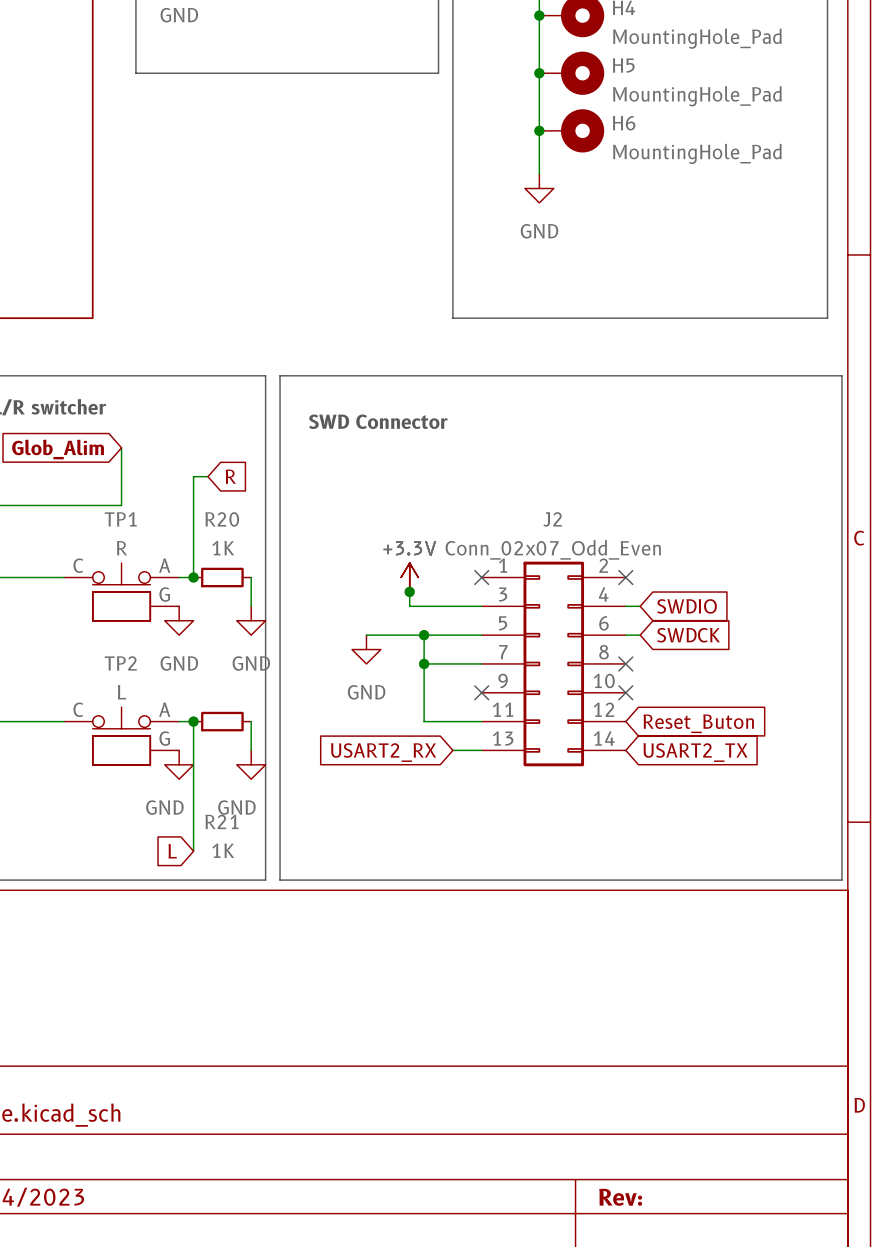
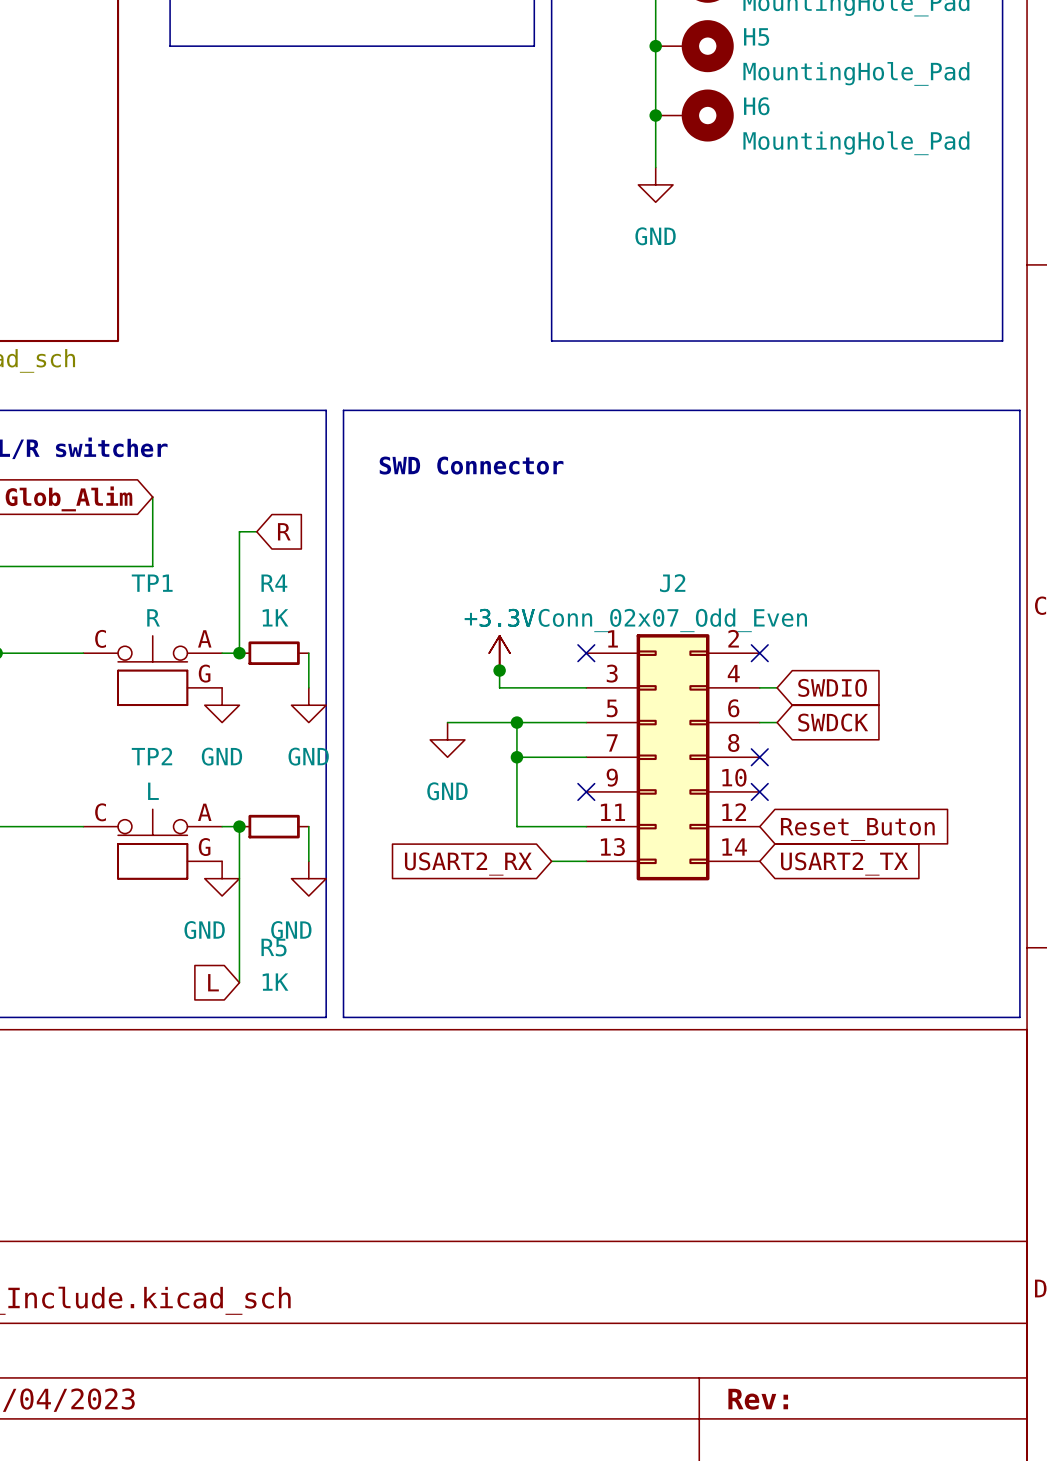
R20 name: R20 (222, 519) -> R4 (274, 583)
R21 name: R21 (221, 821) -> R5 (274, 947)

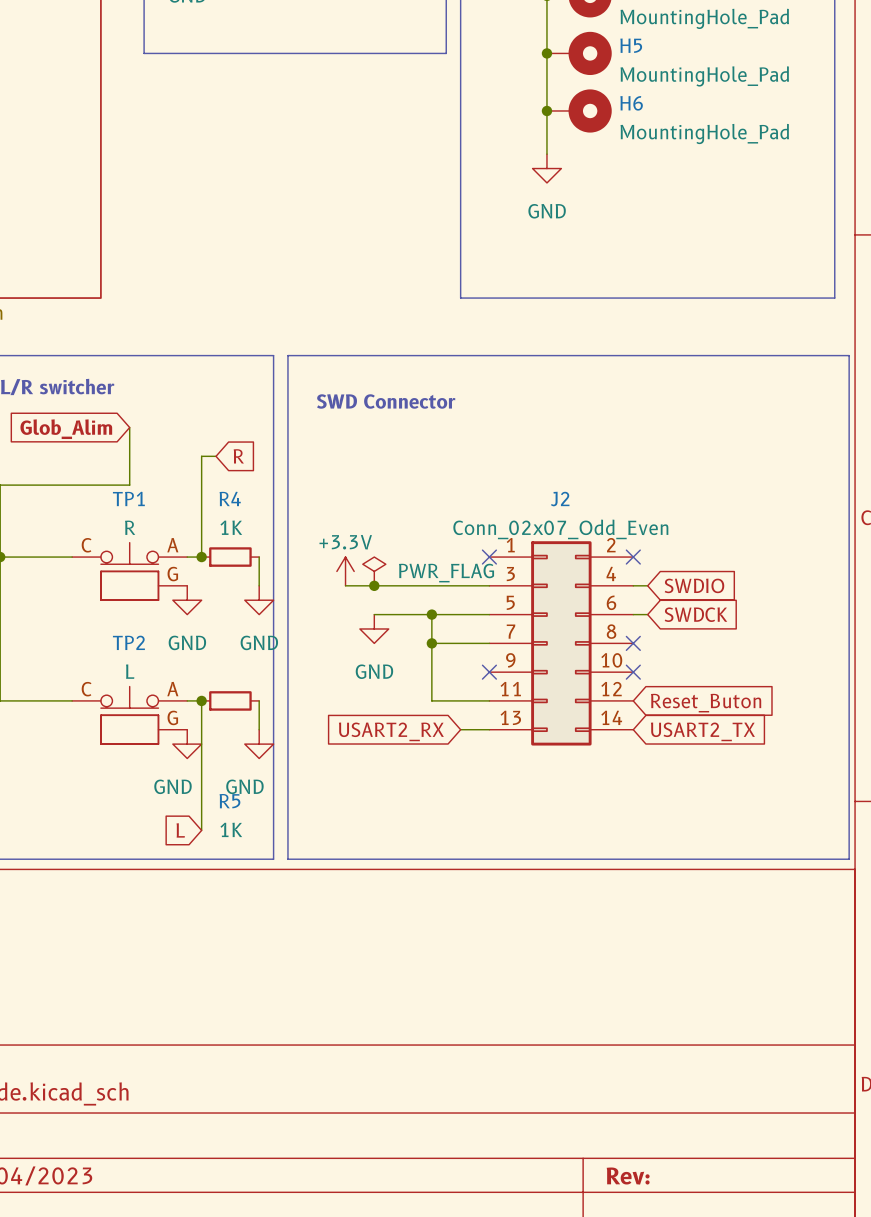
power symbol position: +3.3V (499, 653) -> +3.3V (345, 571)
power symbol: none -> PWR_FLAG (374, 571)
wire: (499, 670) (499, 687) -> (345, 585) (417, 585)
junction position: (499, 670) -> (374, 585)

